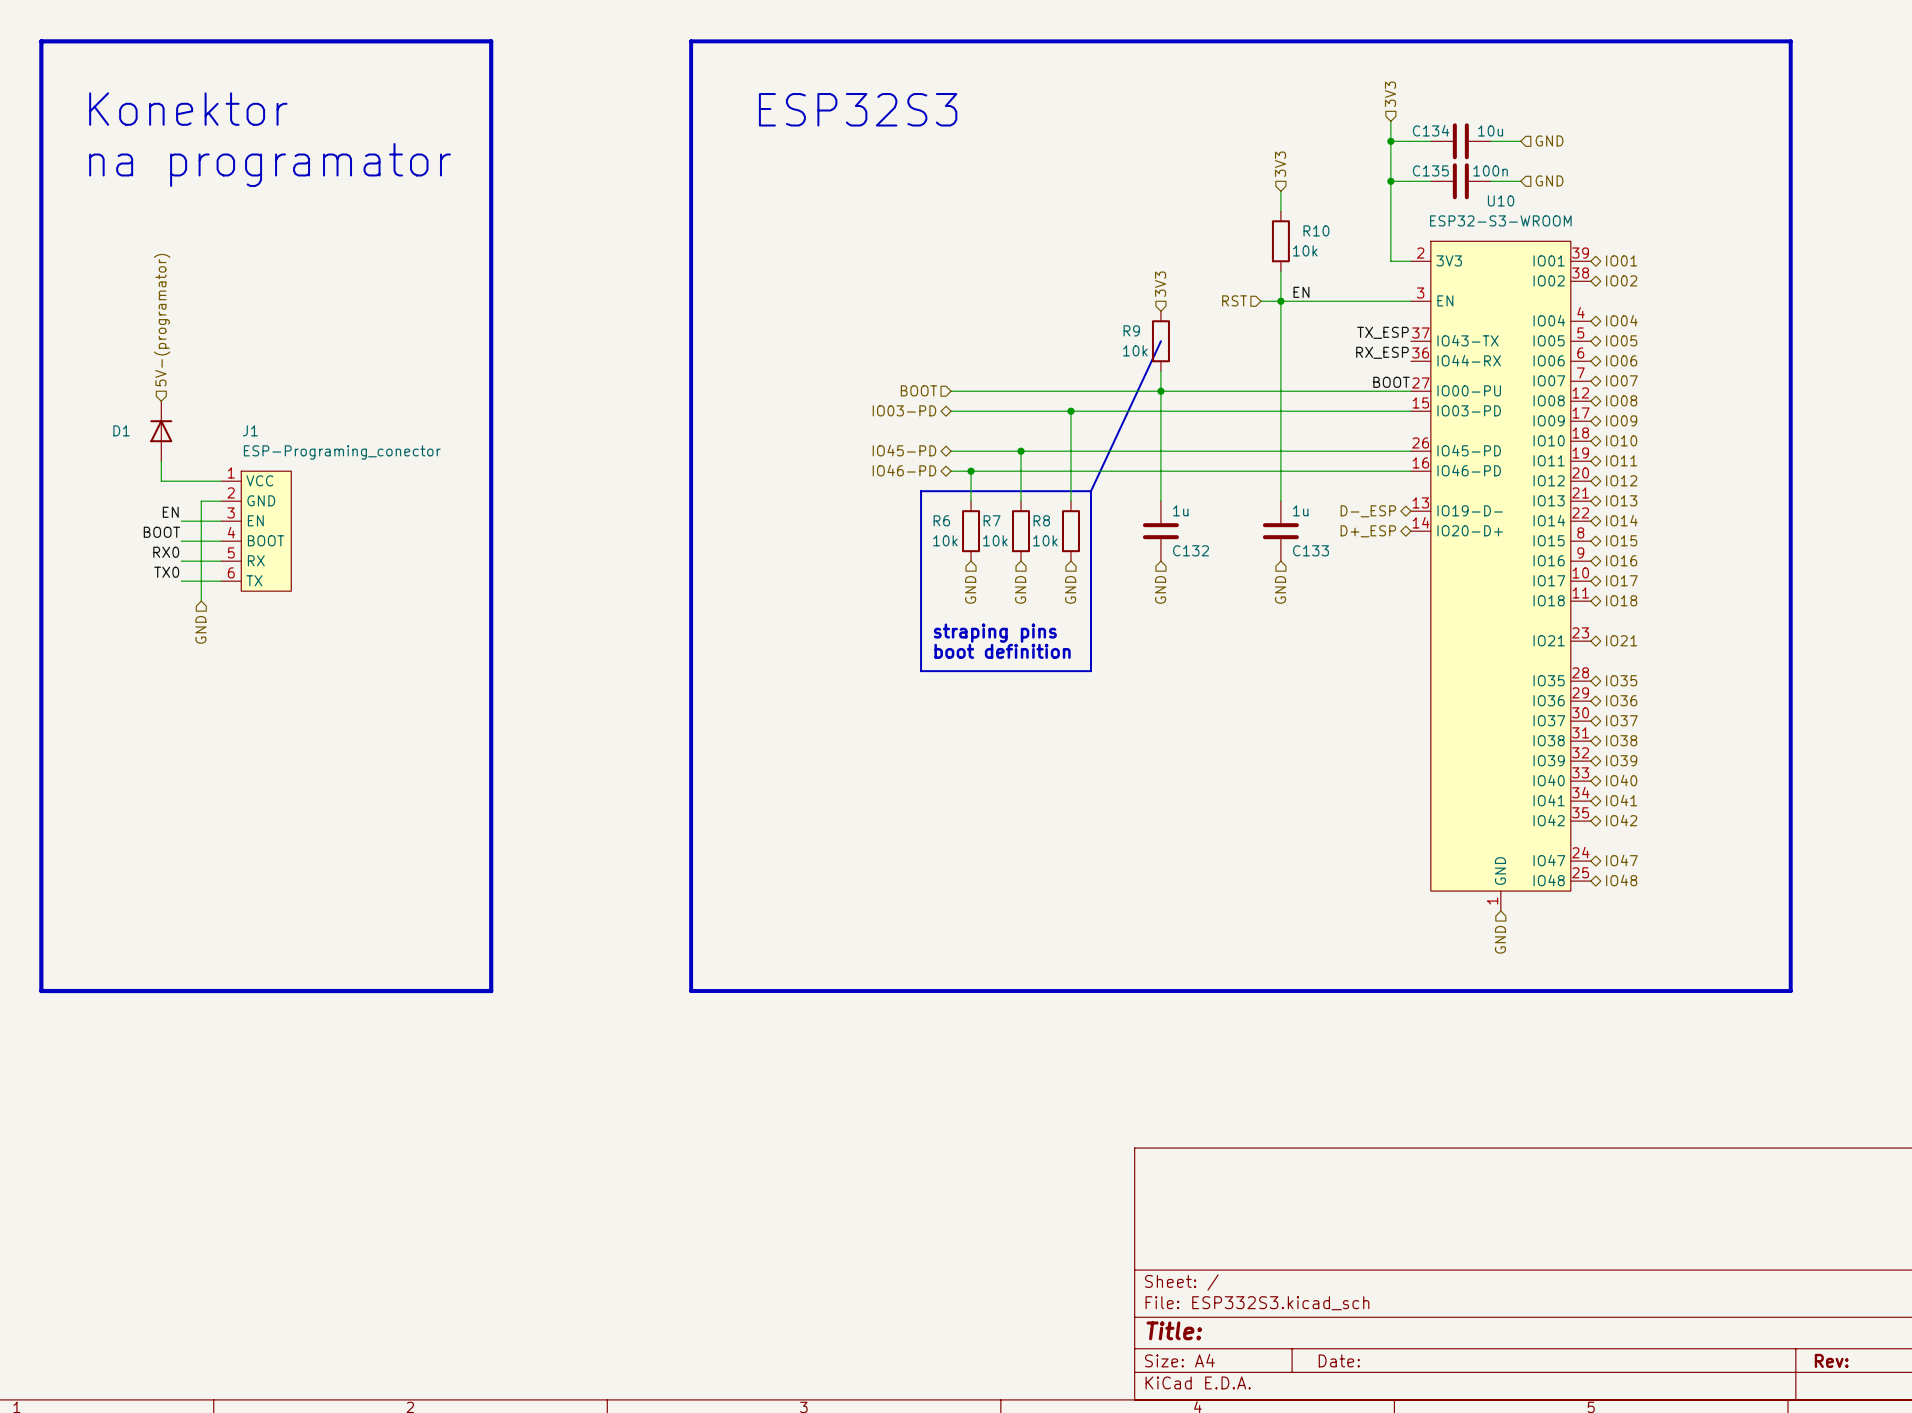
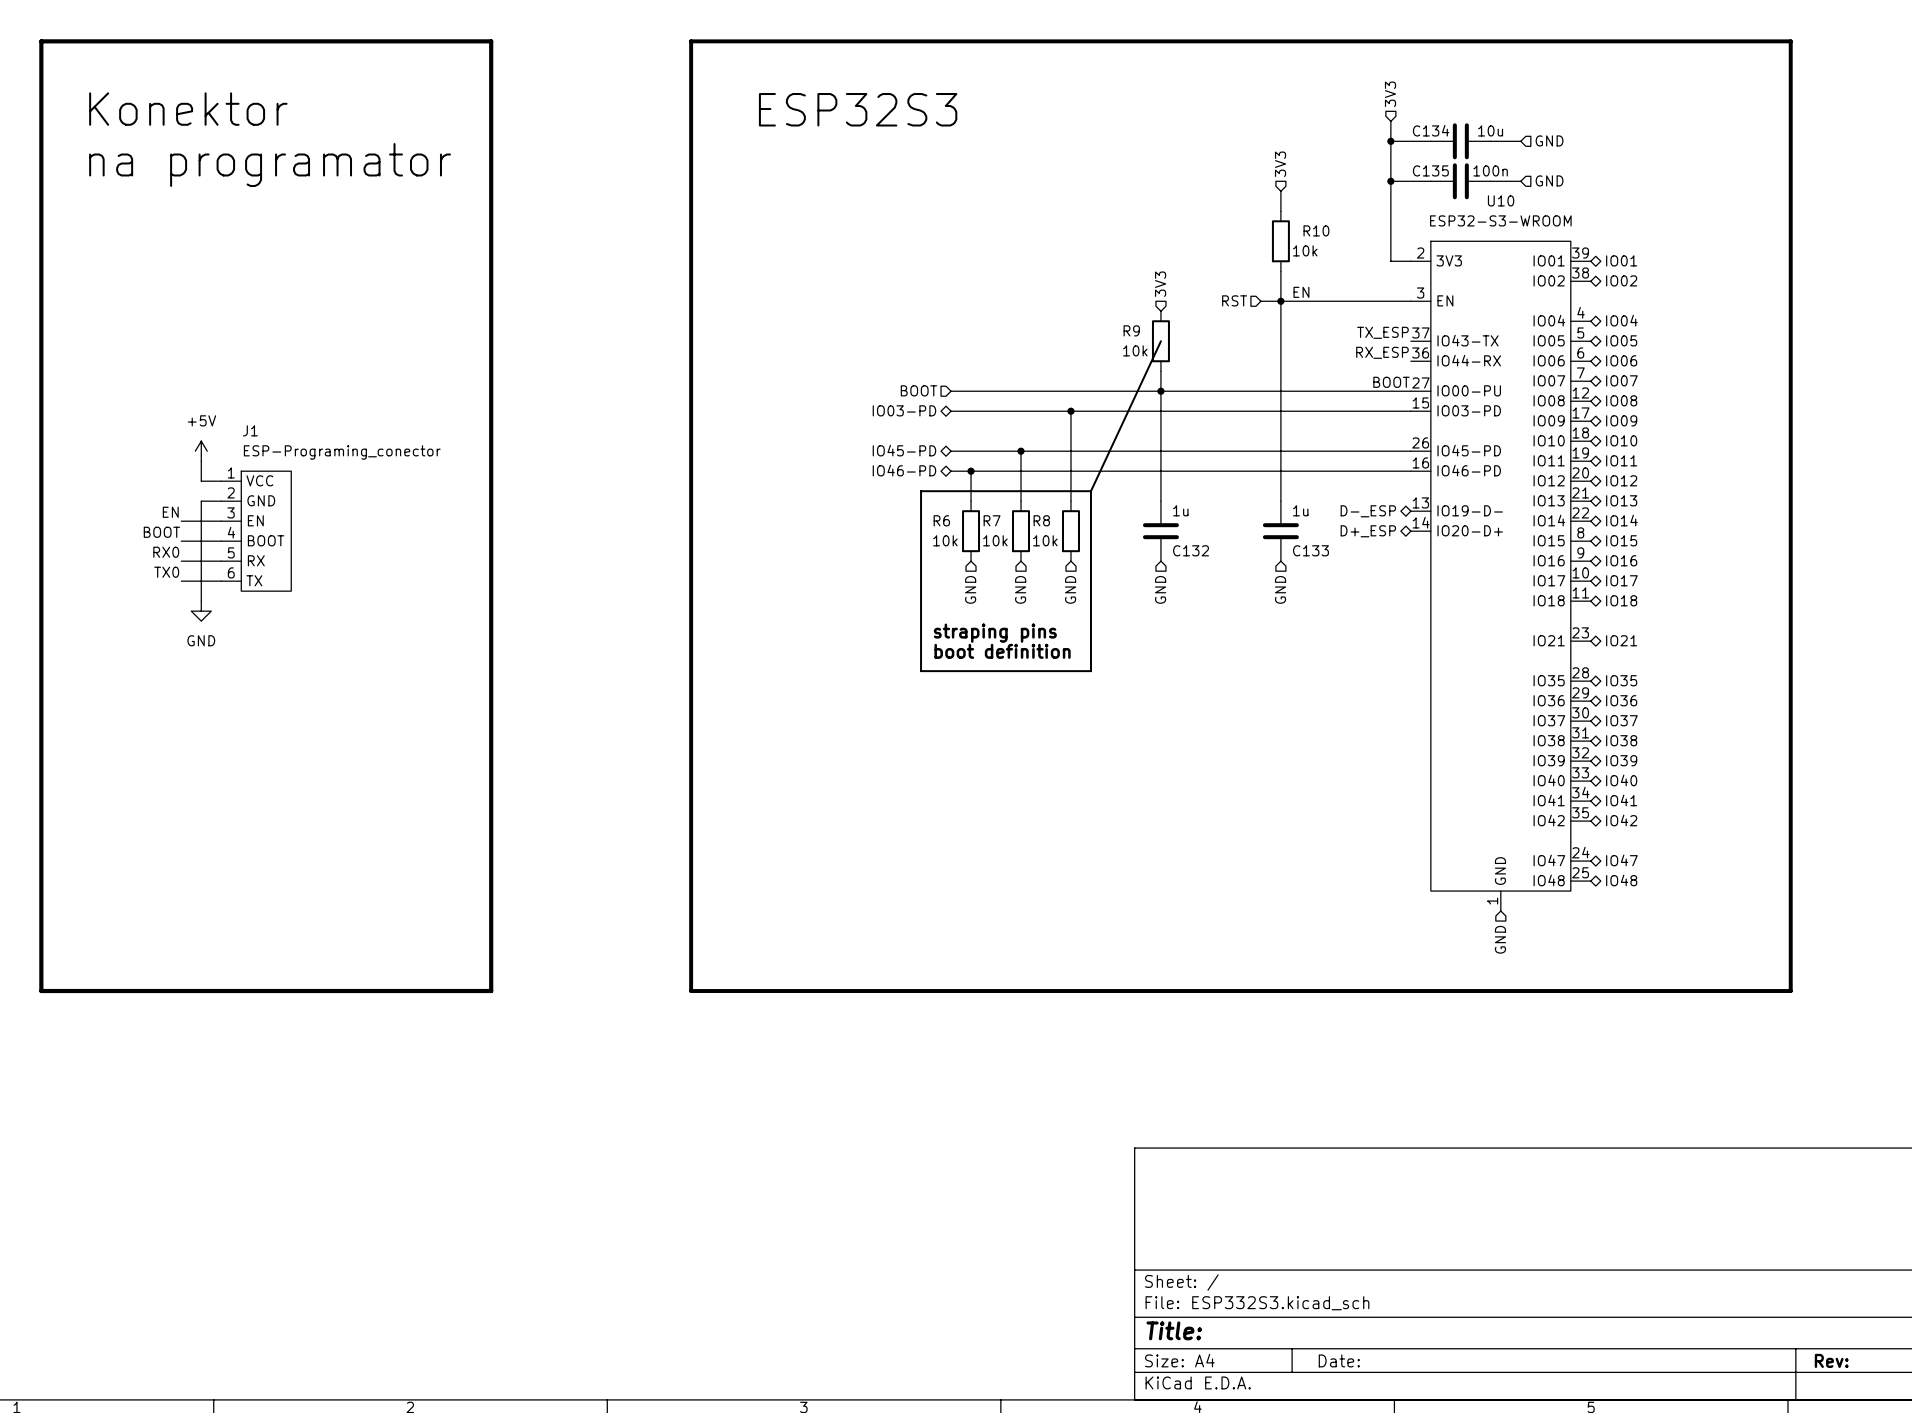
hierarchical label: 5V-(programator) (162, 320) -> none
D1: (161, 431) -> none
power symbol: none -> +5V (201, 451)
wire: (161, 461) (161, 481) (201, 481) -> (201, 461) (201, 481)
power symbol: none -> GND (201, 611)
hierarchical label: GND (200, 629) -> none

